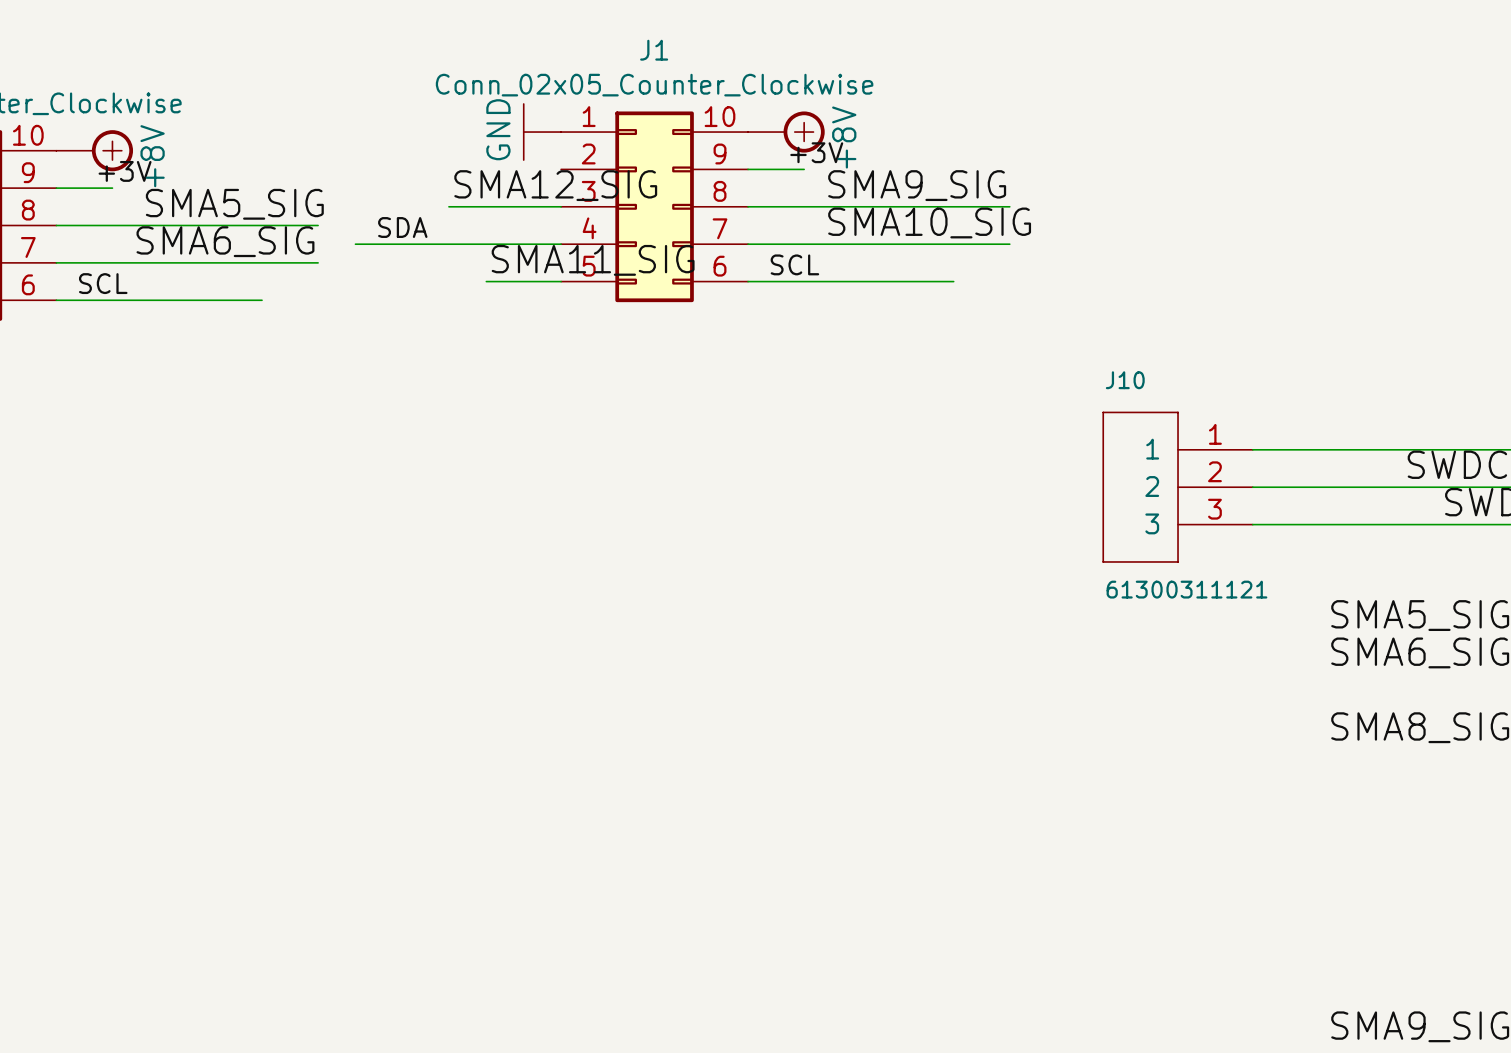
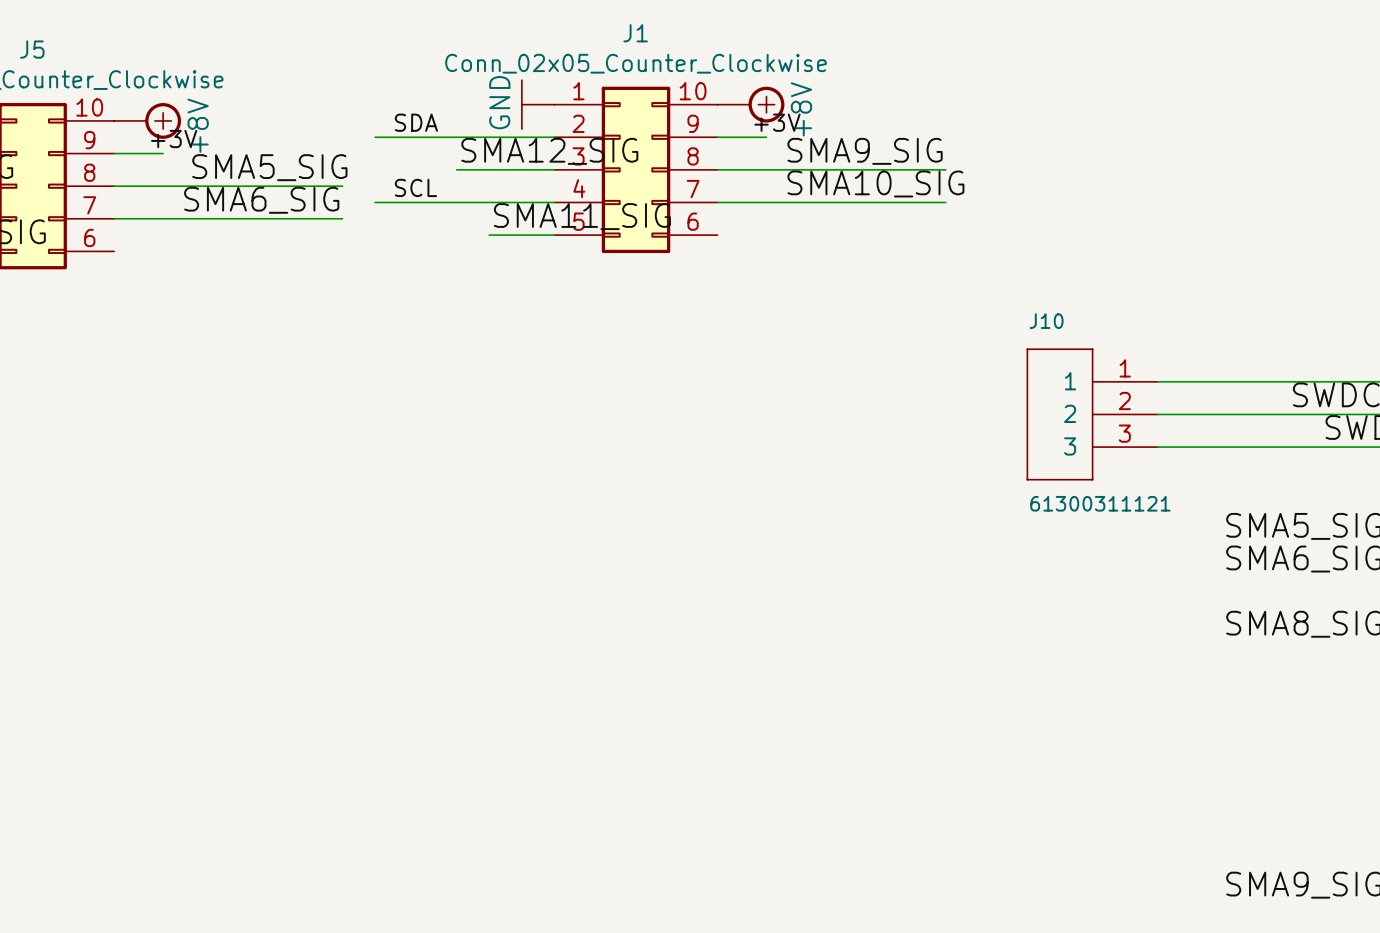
label: none -> SDA (416, 122)
label: SDA (402, 227) -> SCL (416, 187)
label: SCL (794, 264) -> none
wire: (748, 281) (953, 281) -> none
label: SCL (103, 283) -> none
wire: (56, 300) (262, 300) -> (375, 137) (554, 137)

